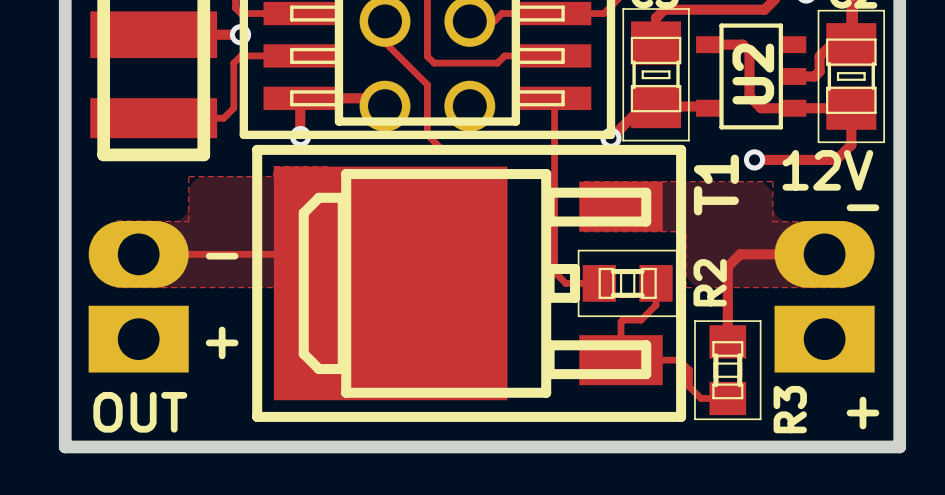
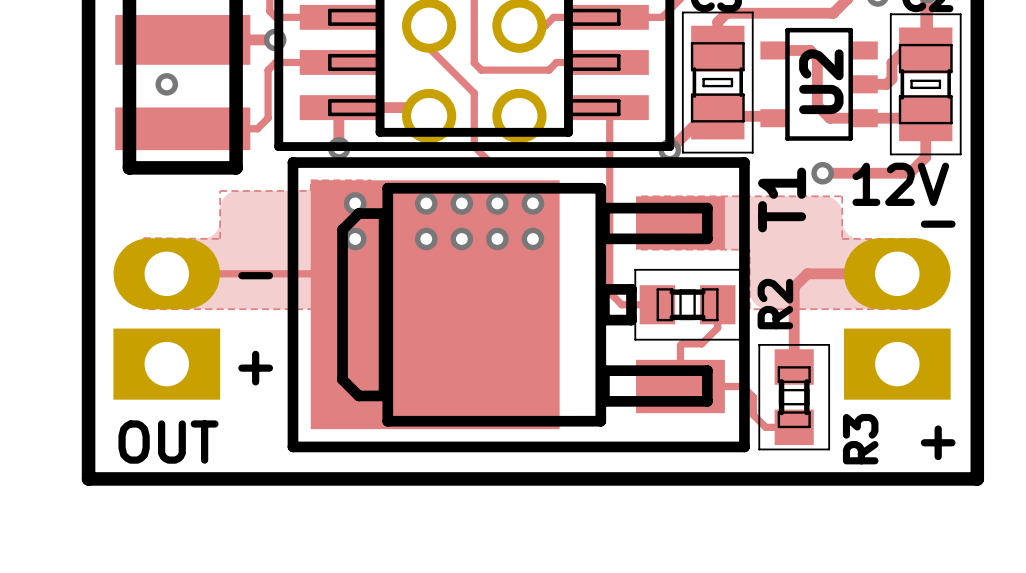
via: none -> (166, 84)
via: none -> (355, 203)
via: none -> (426, 203)
via: none -> (461, 203)
via: none -> (497, 203)
via: none -> (532, 203)
via: none -> (355, 238)
via: none -> (426, 238)
via: none -> (461, 238)
via: none -> (497, 238)
via: none -> (532, 238)

